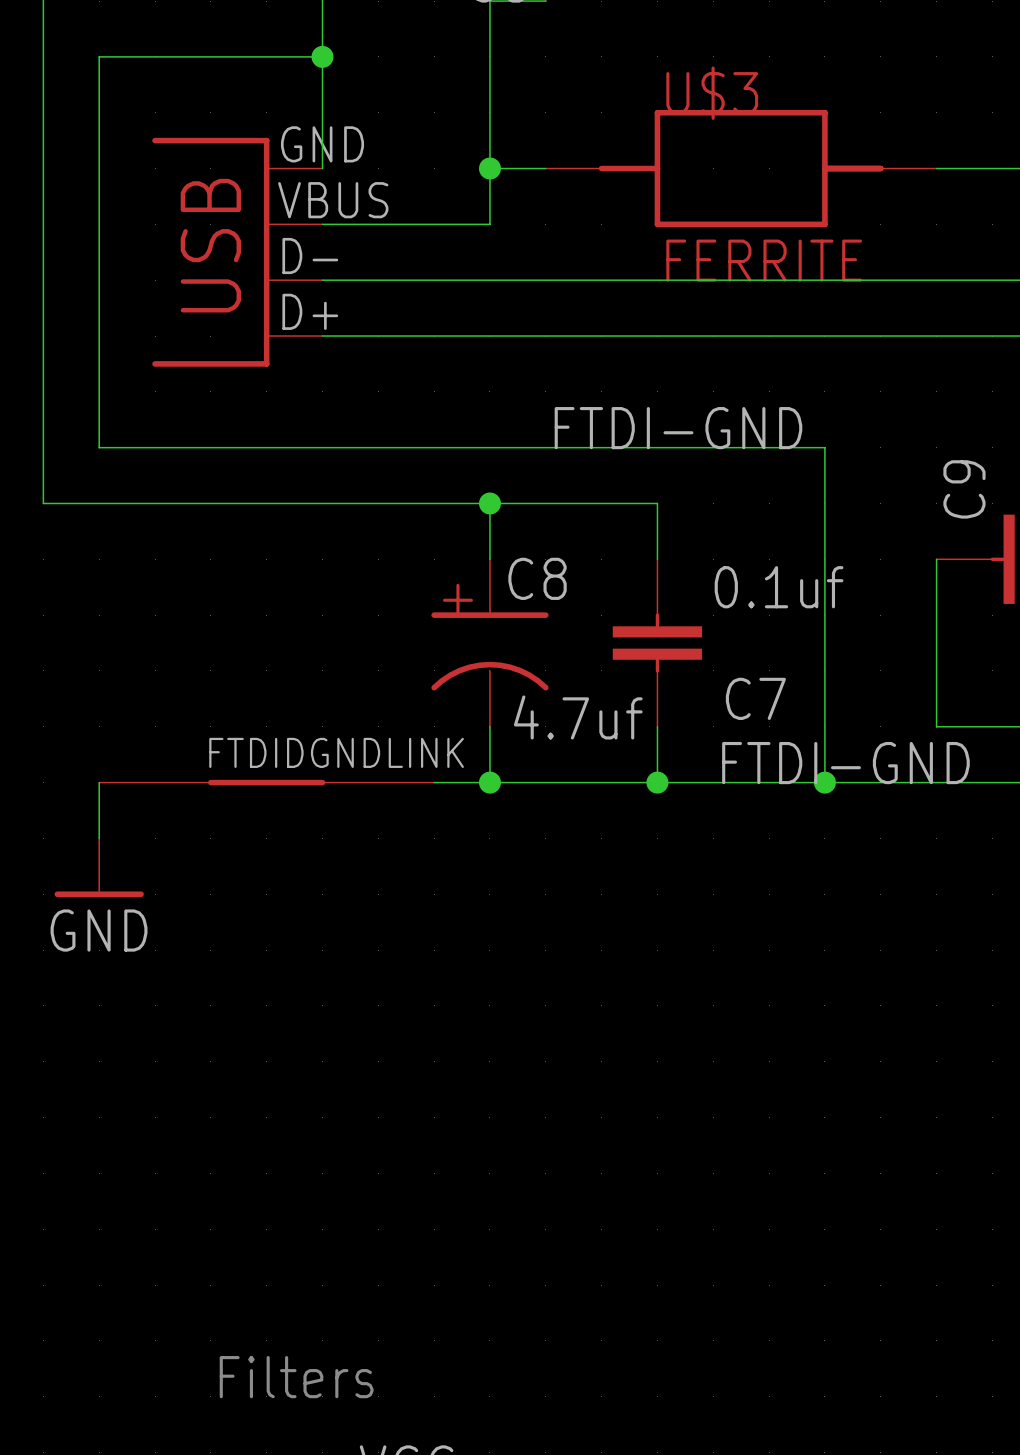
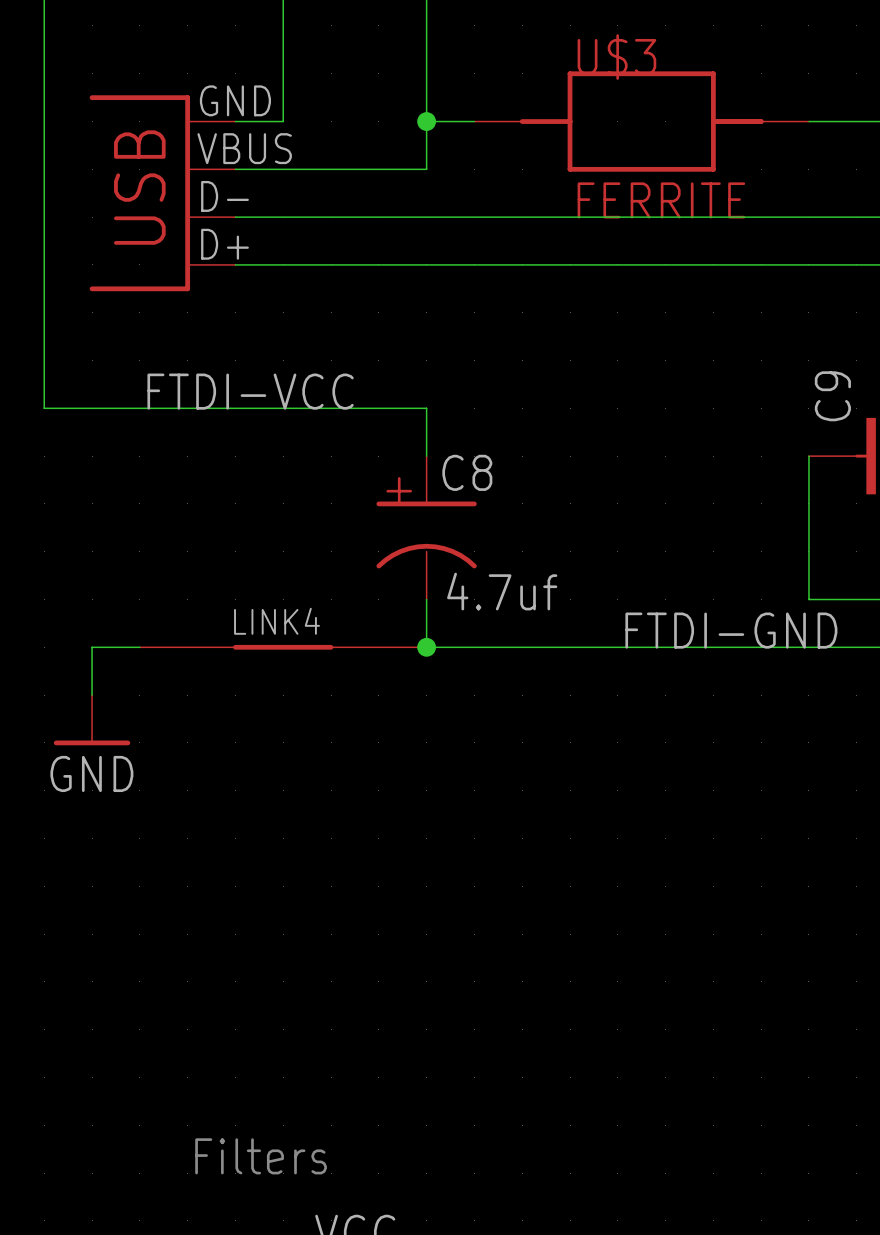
wire: (322, 56) (99, 56) (99, 447) (824, 447) (824, 782) -> none
junction: (322, 56) -> none
part position: (237, 252) -> (162, 193)
label: FTDI-GND (678, 428) -> none
label: none -> FTDI-VCC (250, 391)
wire: (489, 503) (657, 503) (657, 559) -> none
junction: (489, 503) -> none
C7: 0.1uf (657, 643) -> none
wire: (657, 726) (657, 782) -> none
FTDIDGNDLINK: (266, 782) -> none
LINK4: none -> (283, 647)
junction: (657, 782) -> none
junction: (824, 782) -> none

